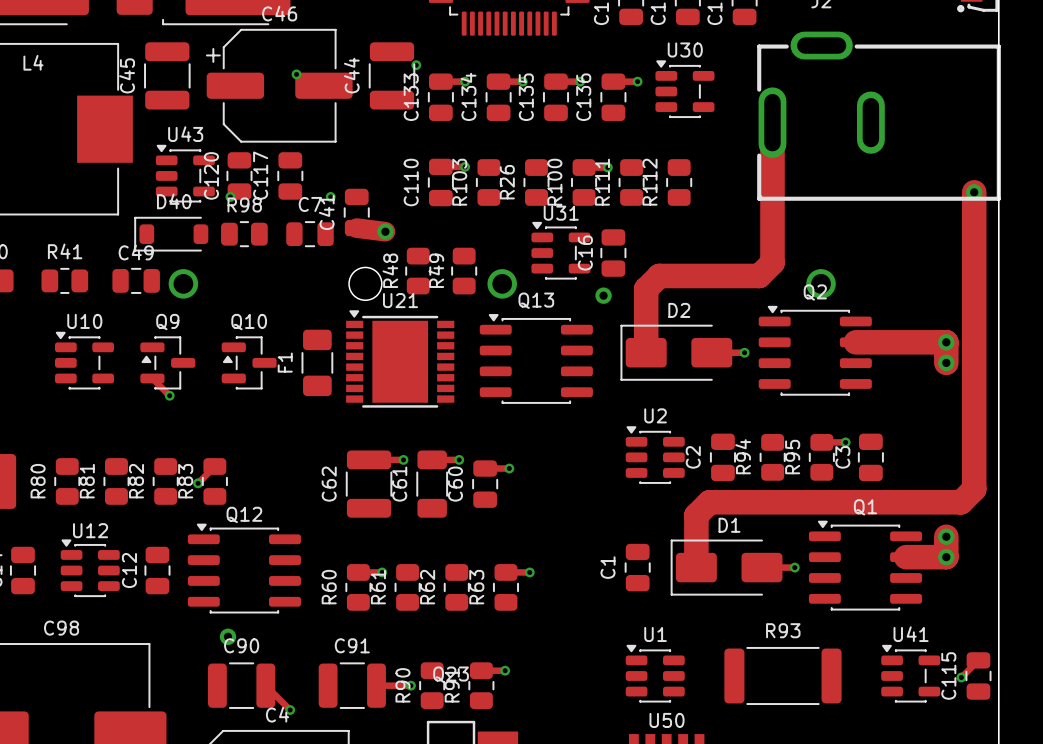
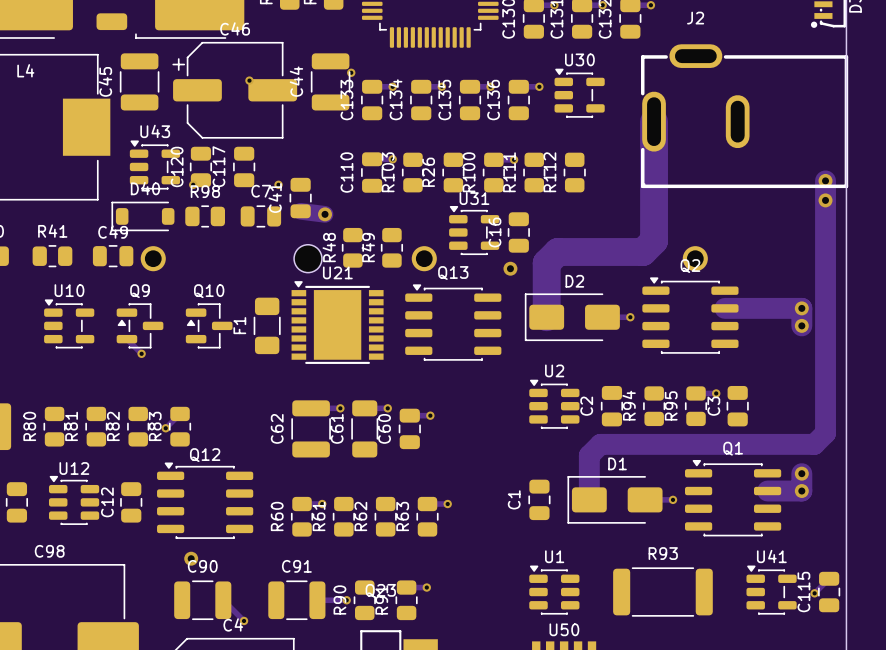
track width: thin (772, 122) (772, 262) (759, 275) (659, 275) (646, 289) (646, 352) -> thick (654, 121) (654, 240) (642, 251) (557, 251) (546, 263) (546, 317)
via: none -> (825, 200)

